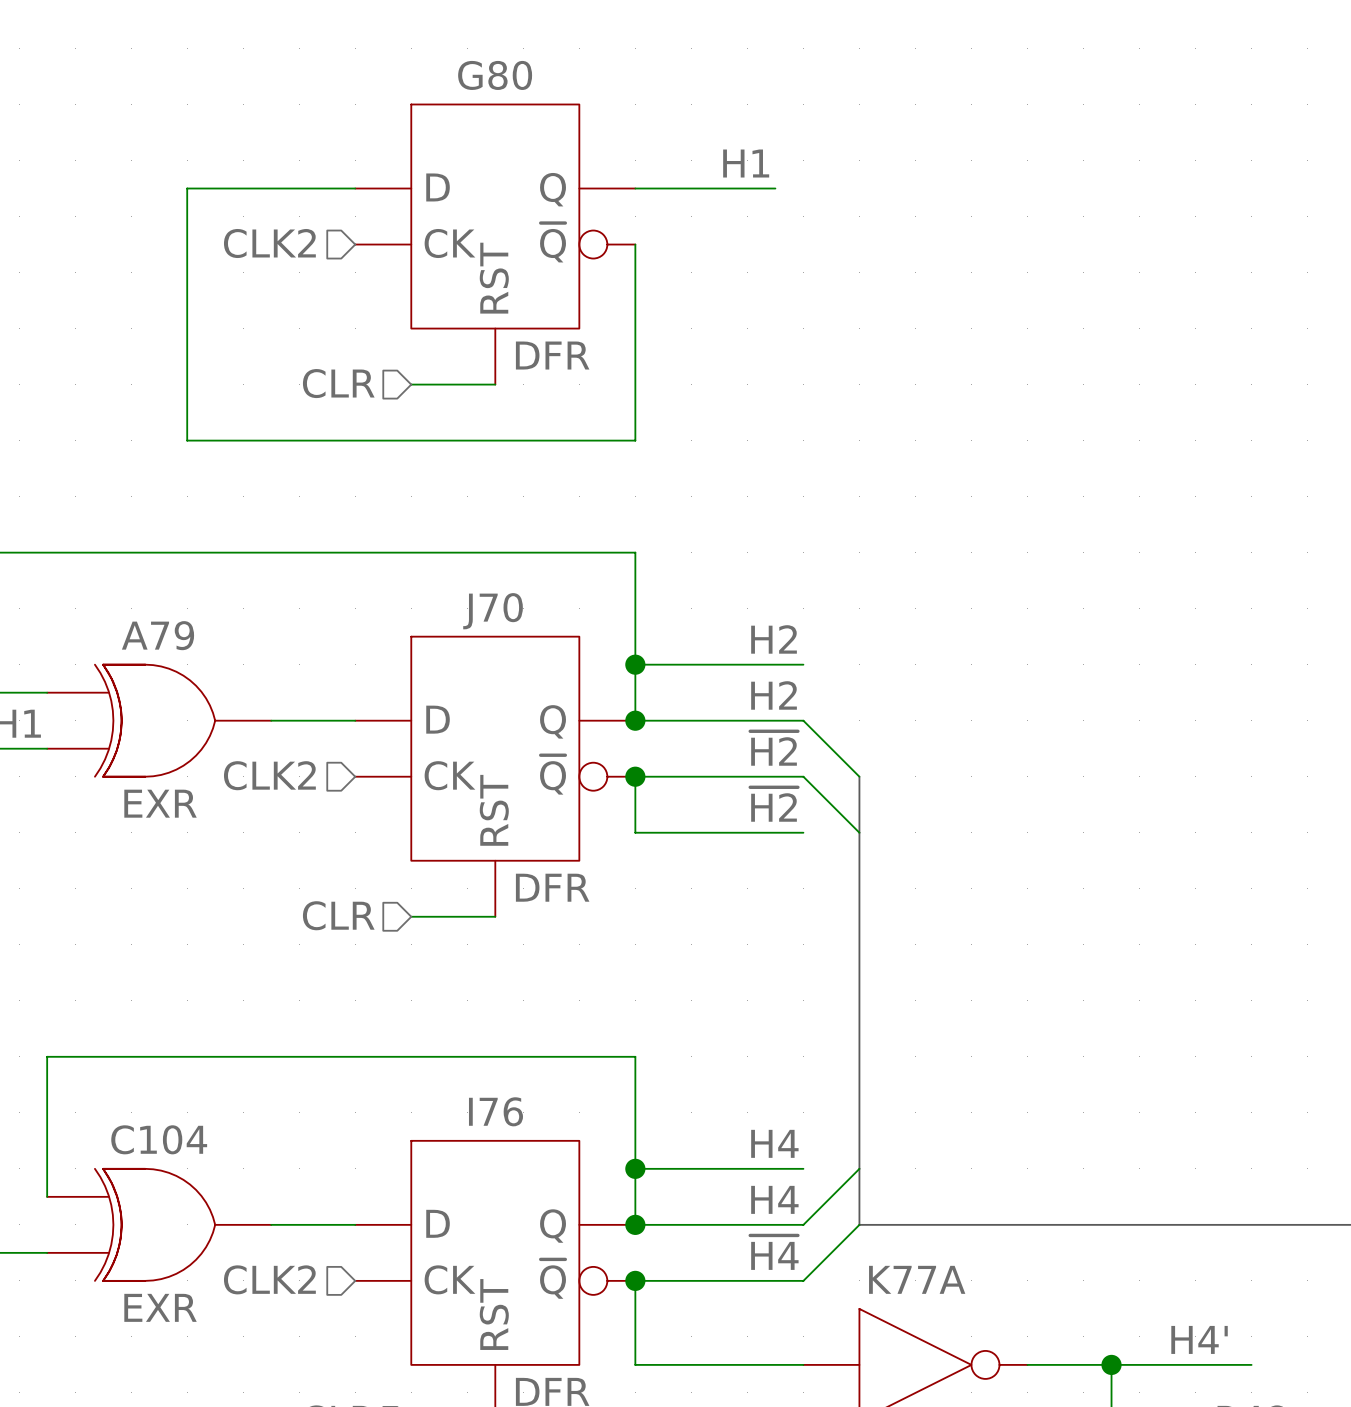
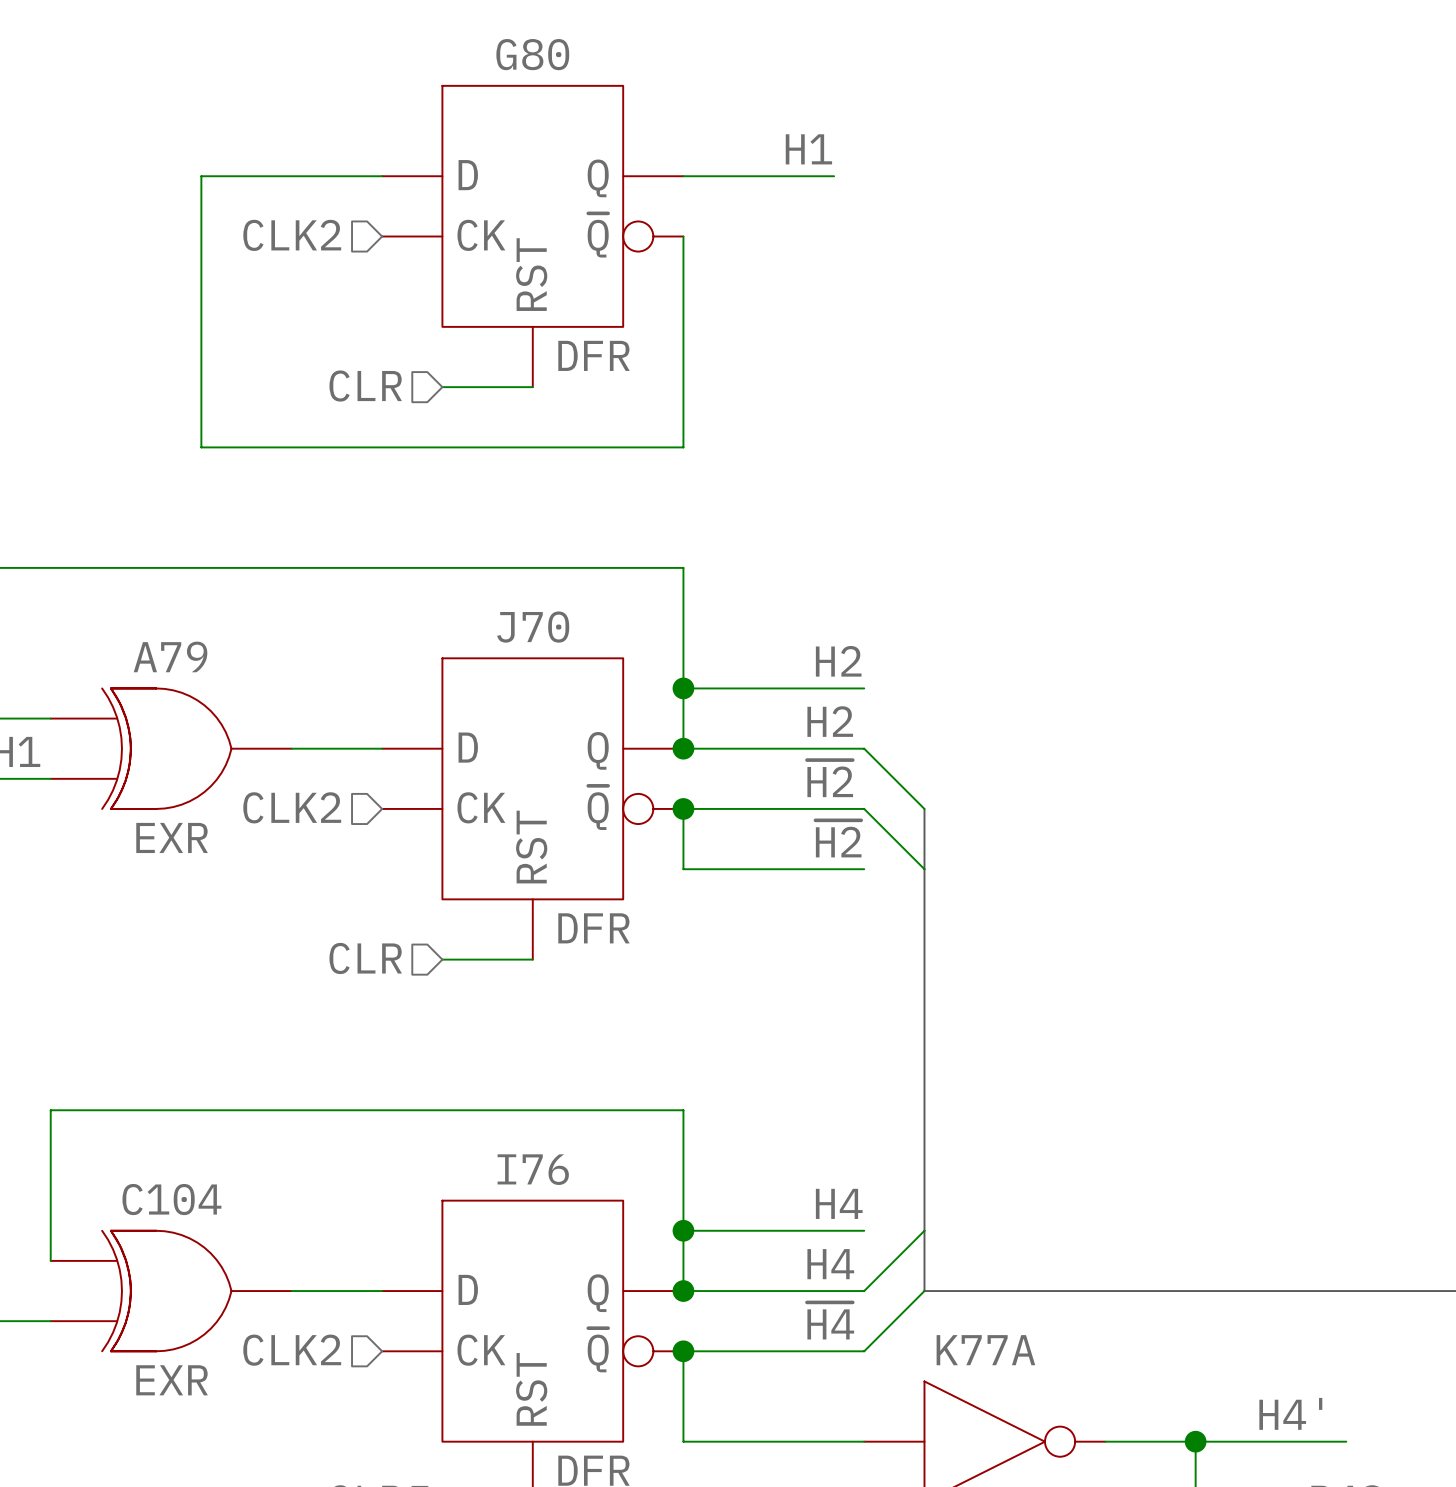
label position: H1 (746, 163) -> H1 (808, 149)
label position: H2 (774, 639) -> H2 (838, 661)
label position: ~{H2} (774, 804) -> ~{H2} (838, 838)
label position: H4 (774, 1143) -> H4 (839, 1203)

